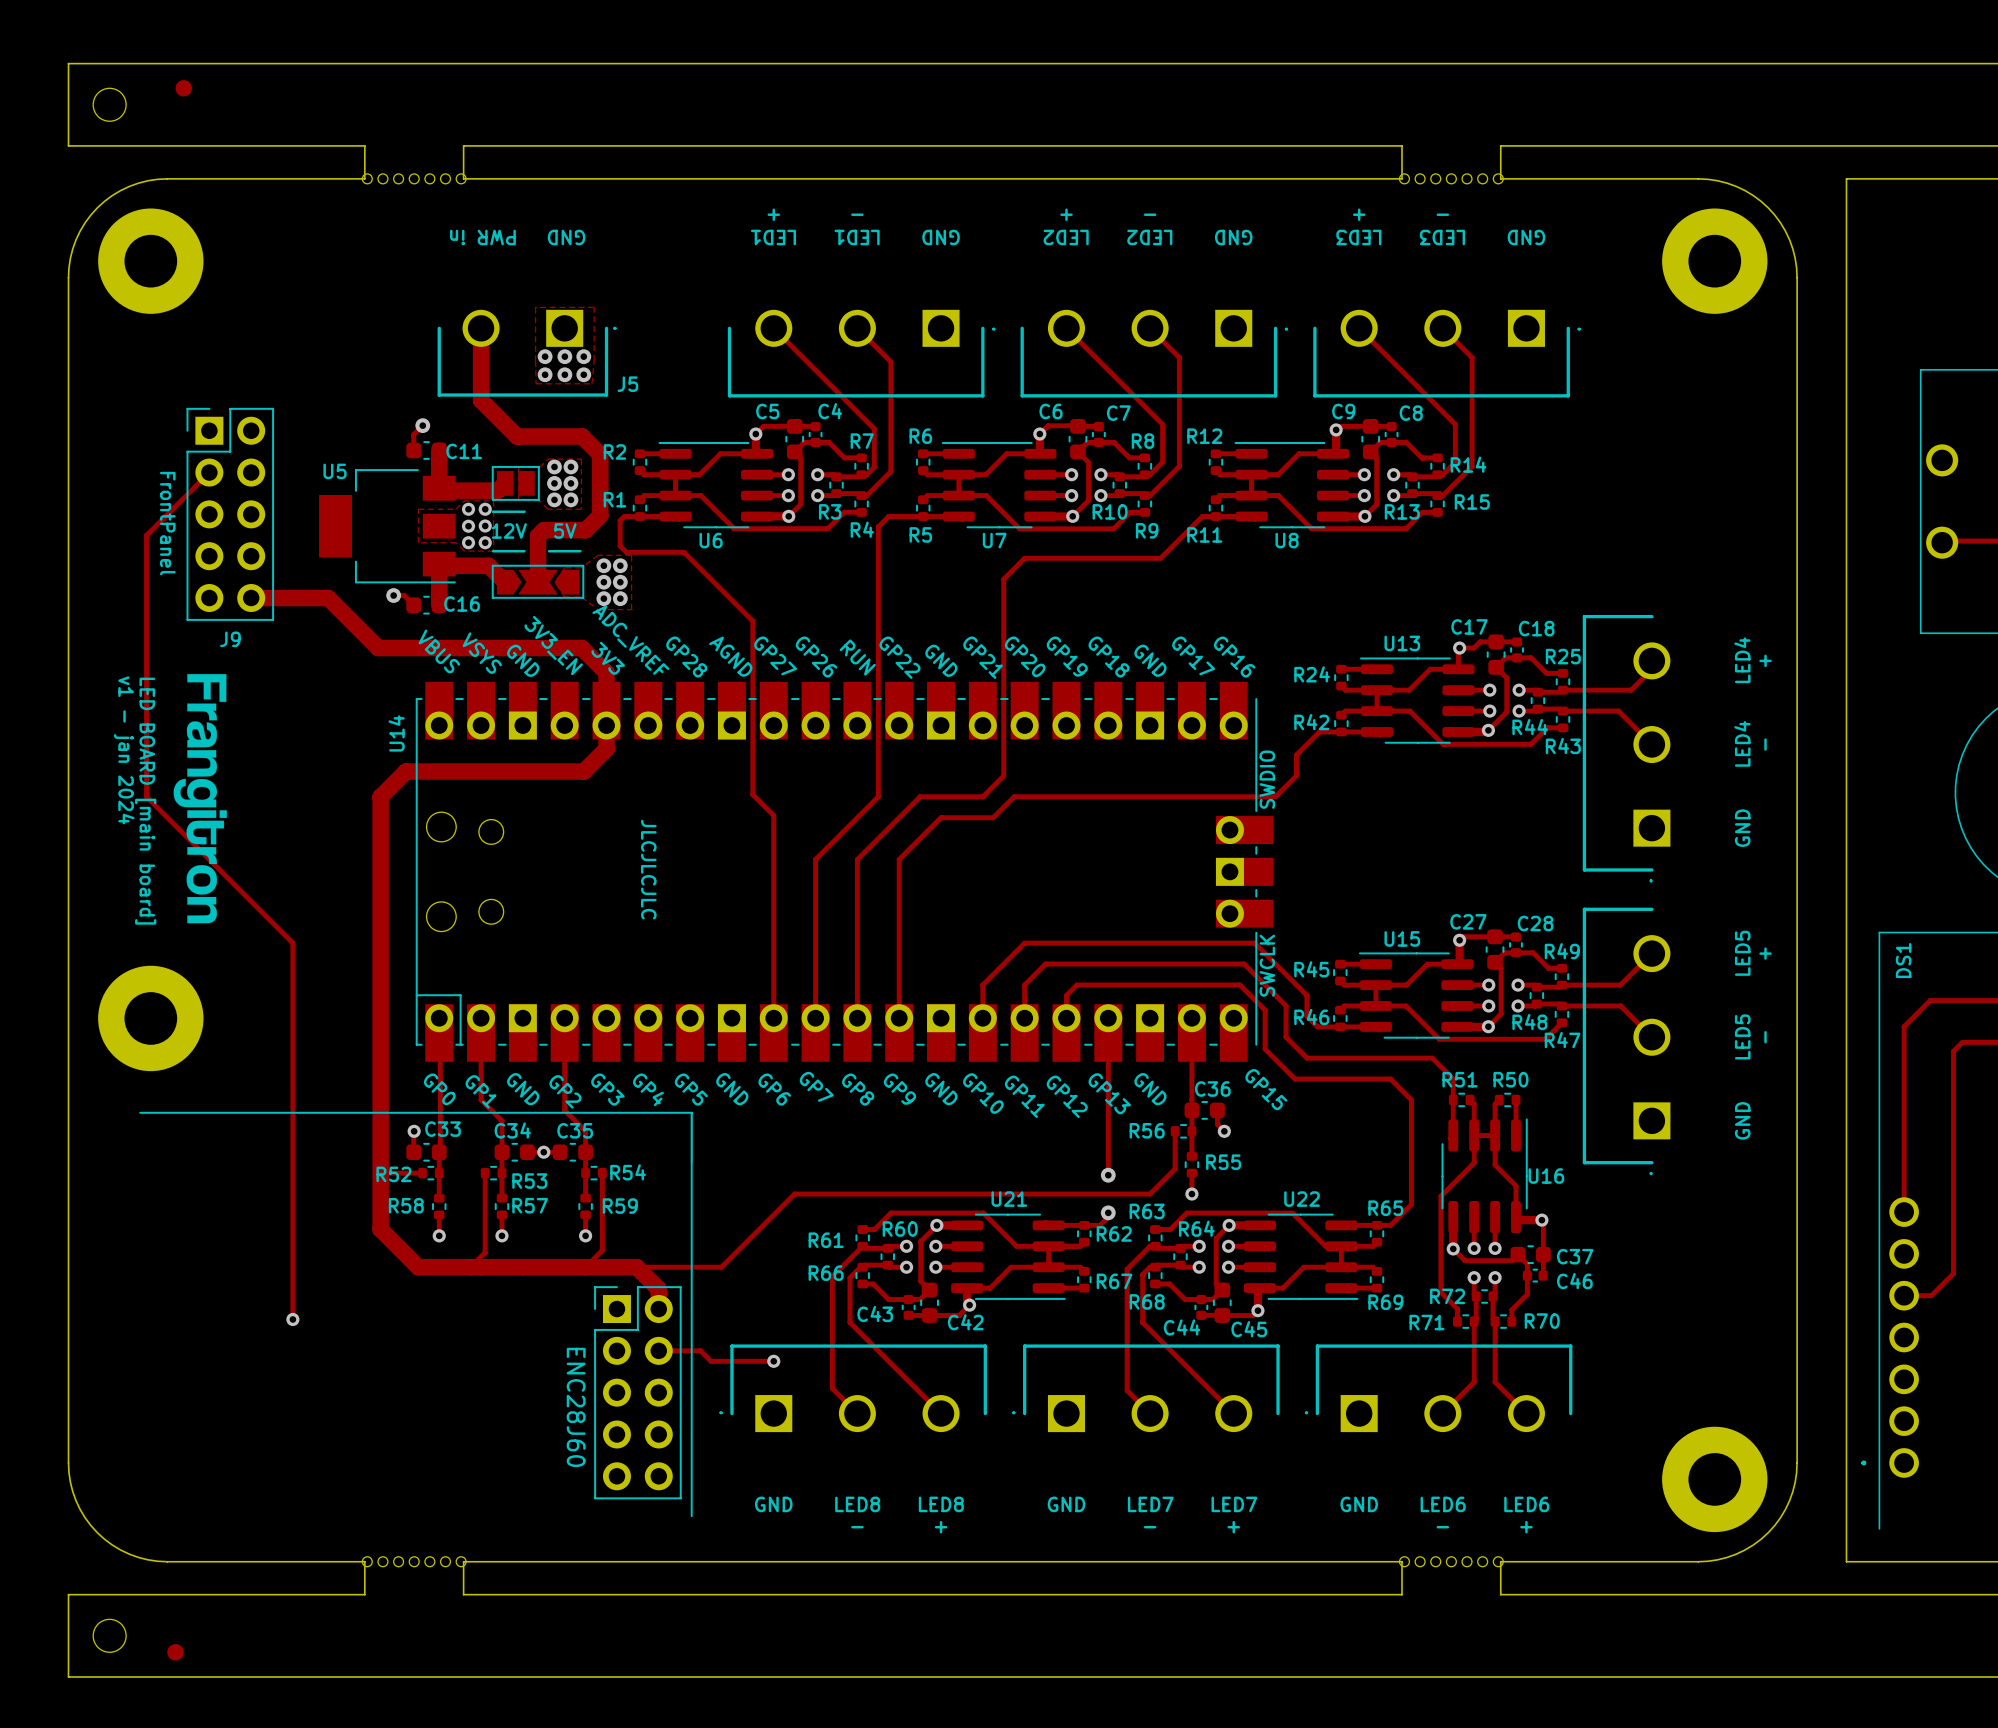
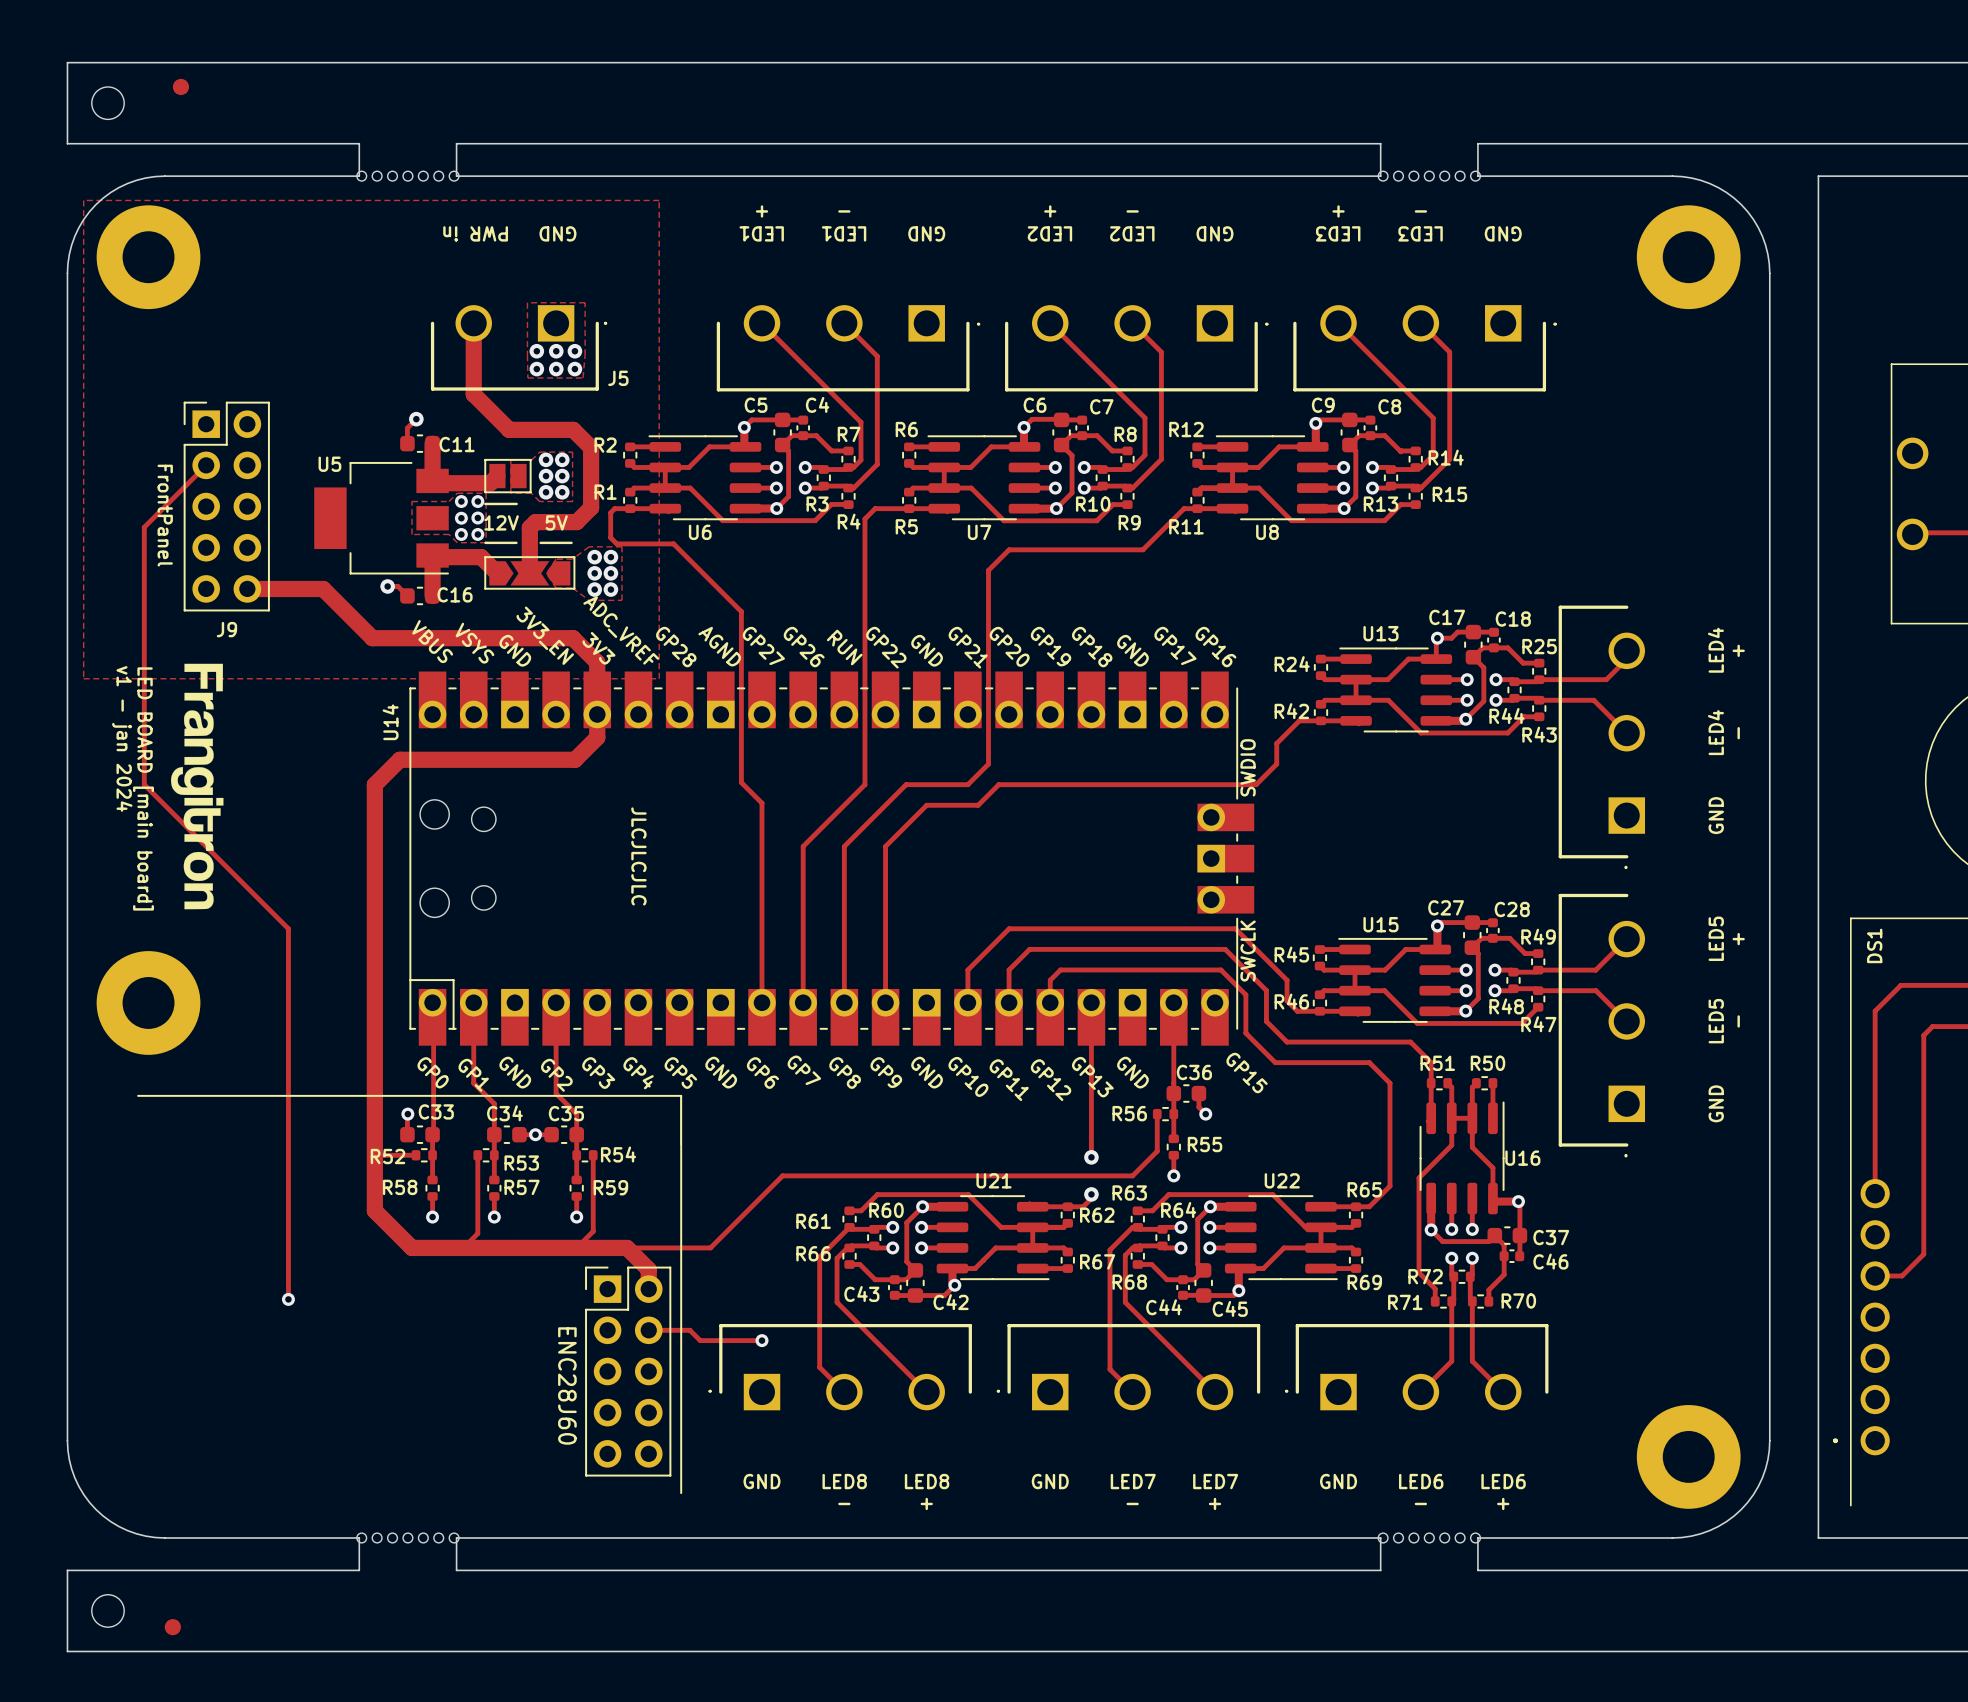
zone outline: none -> (83, 200) (83, 678) (659, 678) (659, 200) (83, 200)

